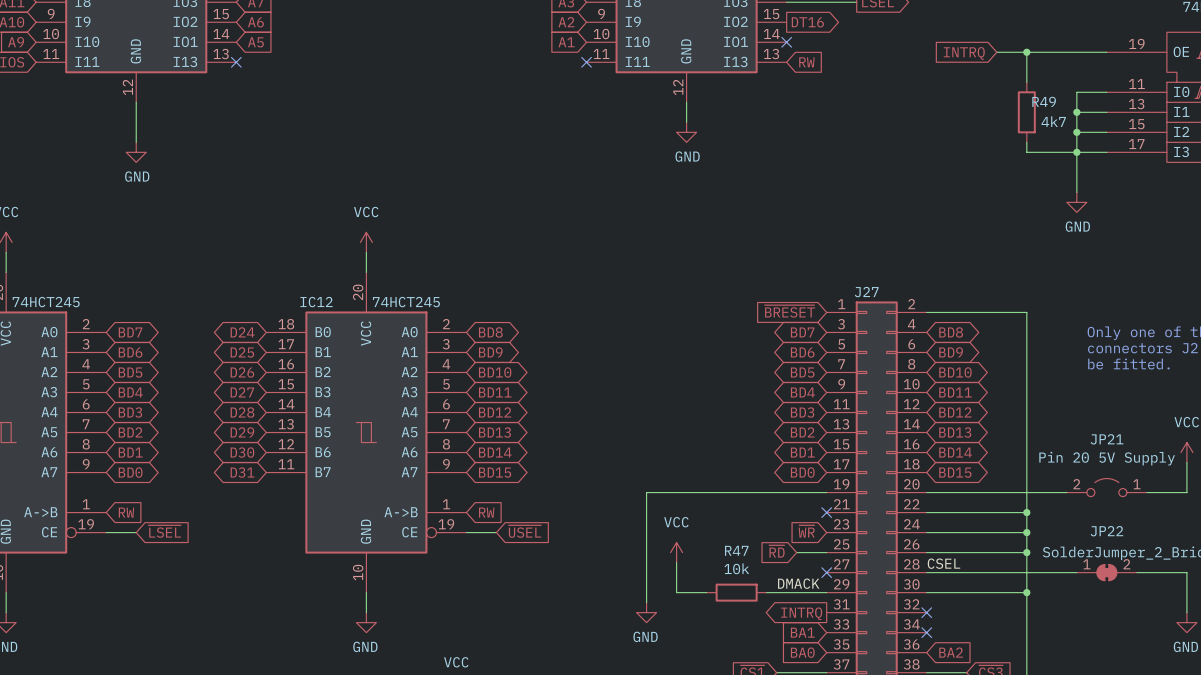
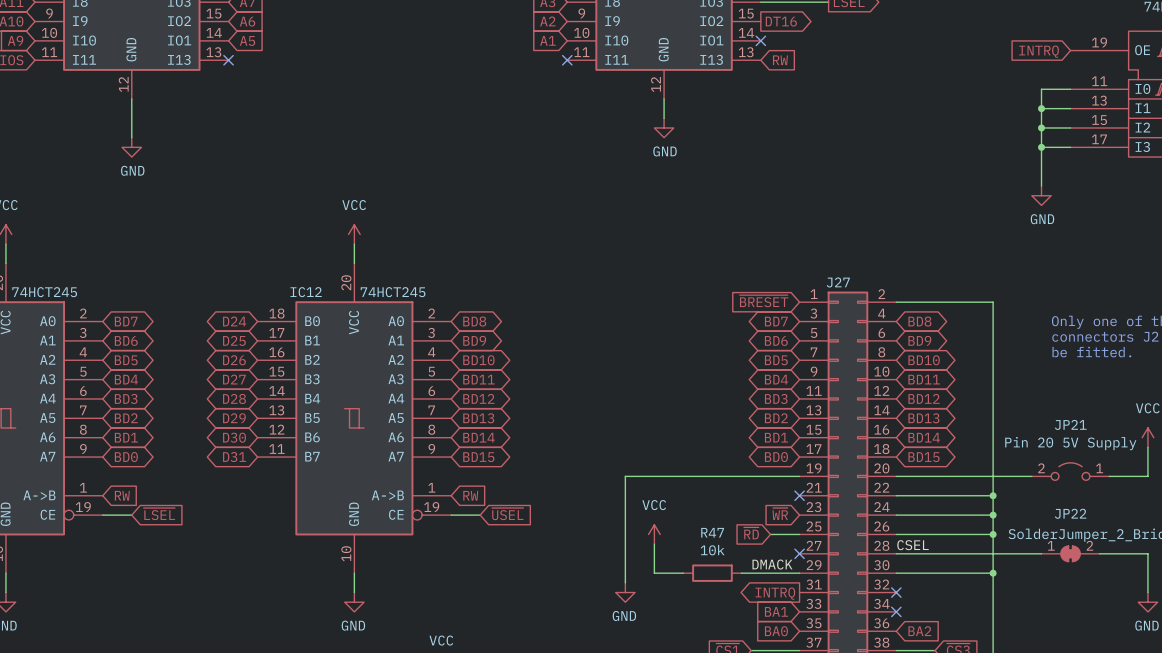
wire: (996, 52) (1106, 52) -> none
wire: (1026, 52) (1026, 82) -> none
junction: (1026, 52) -> none
global label position: INTRQ (964, 53) -> INTRQ (1039, 51)
R49: 4k7 (1026, 112) -> none
wire: (1026, 142) (1026, 152) (1076, 152) -> none

